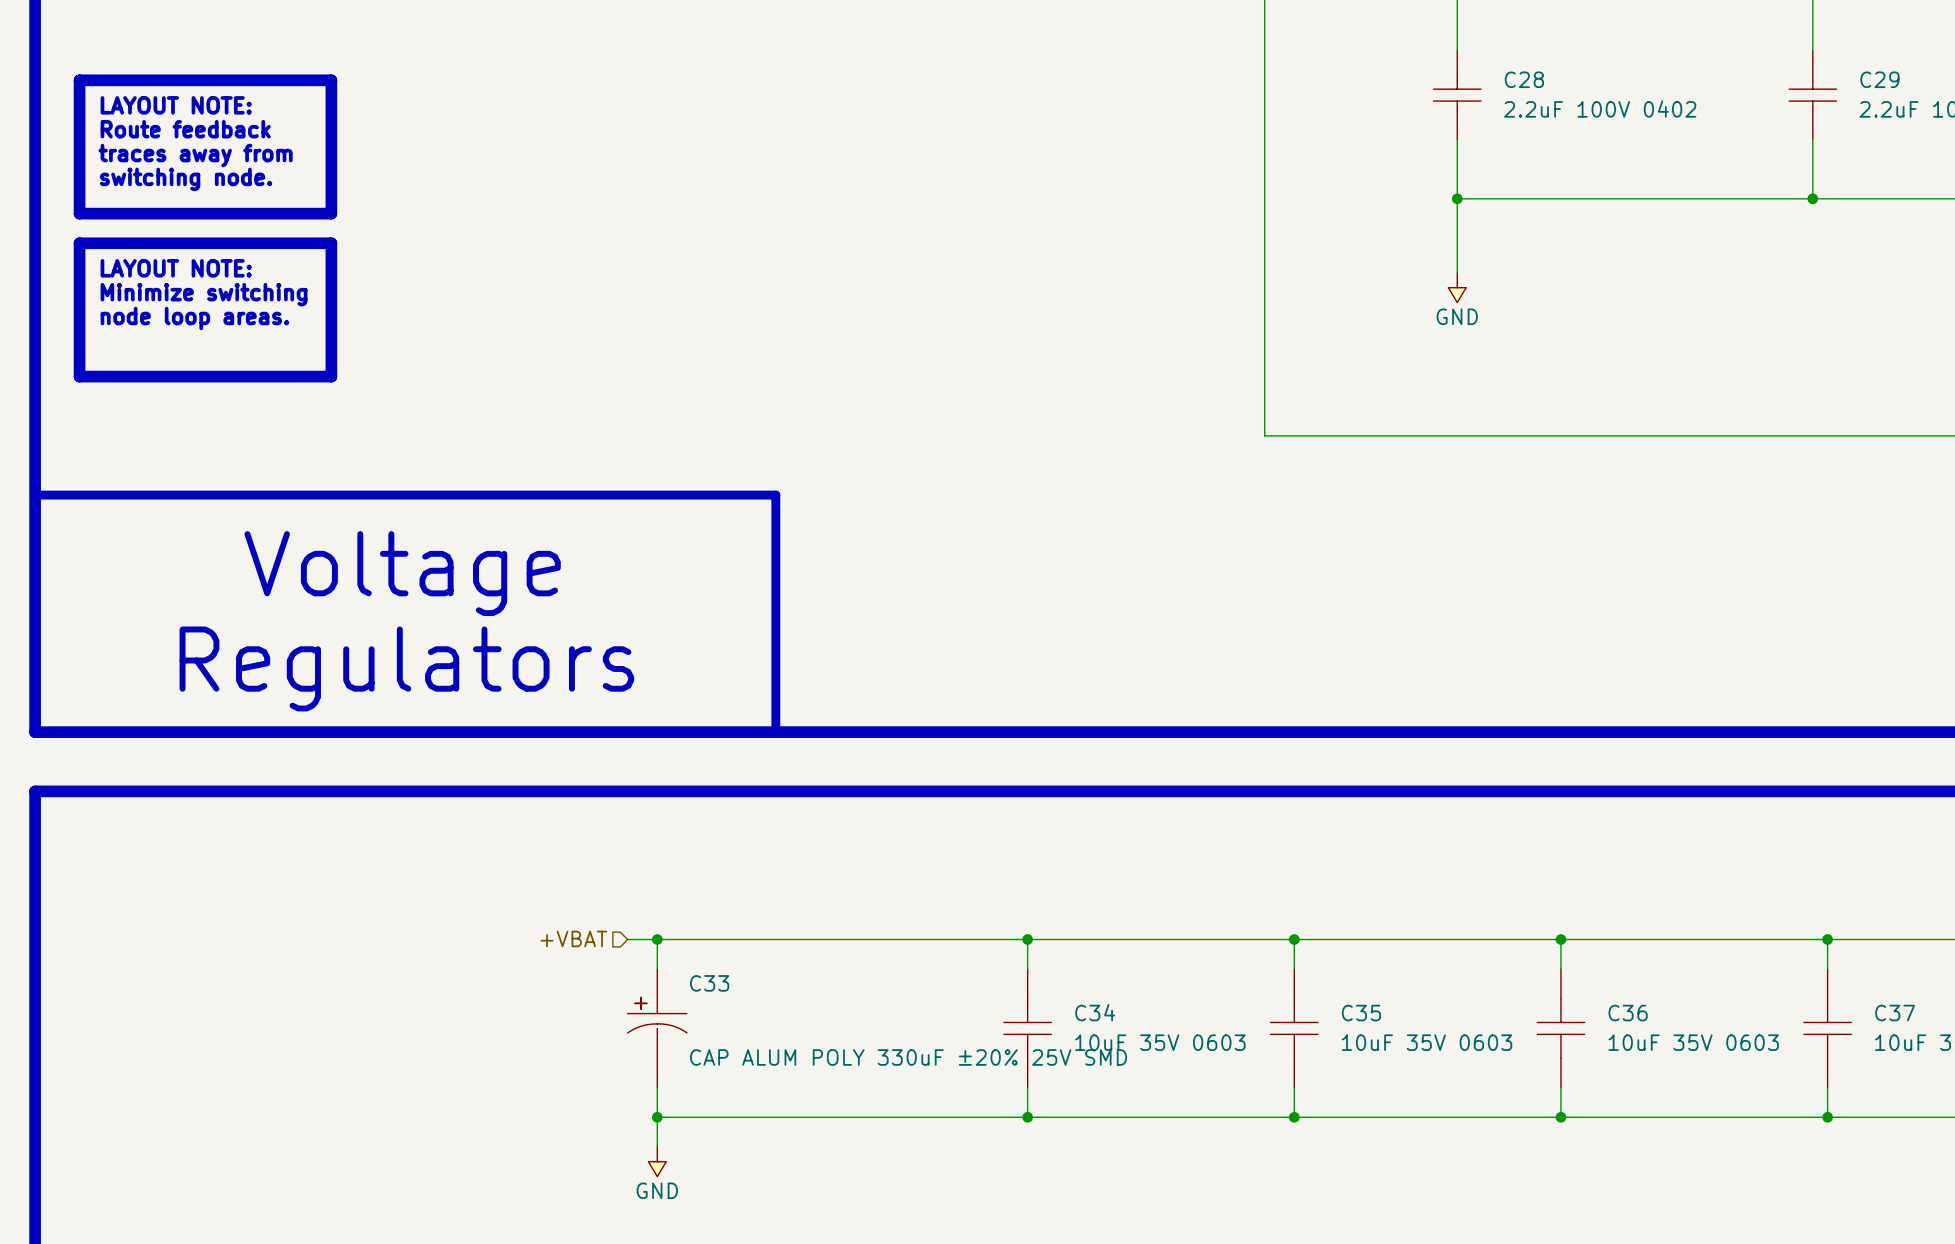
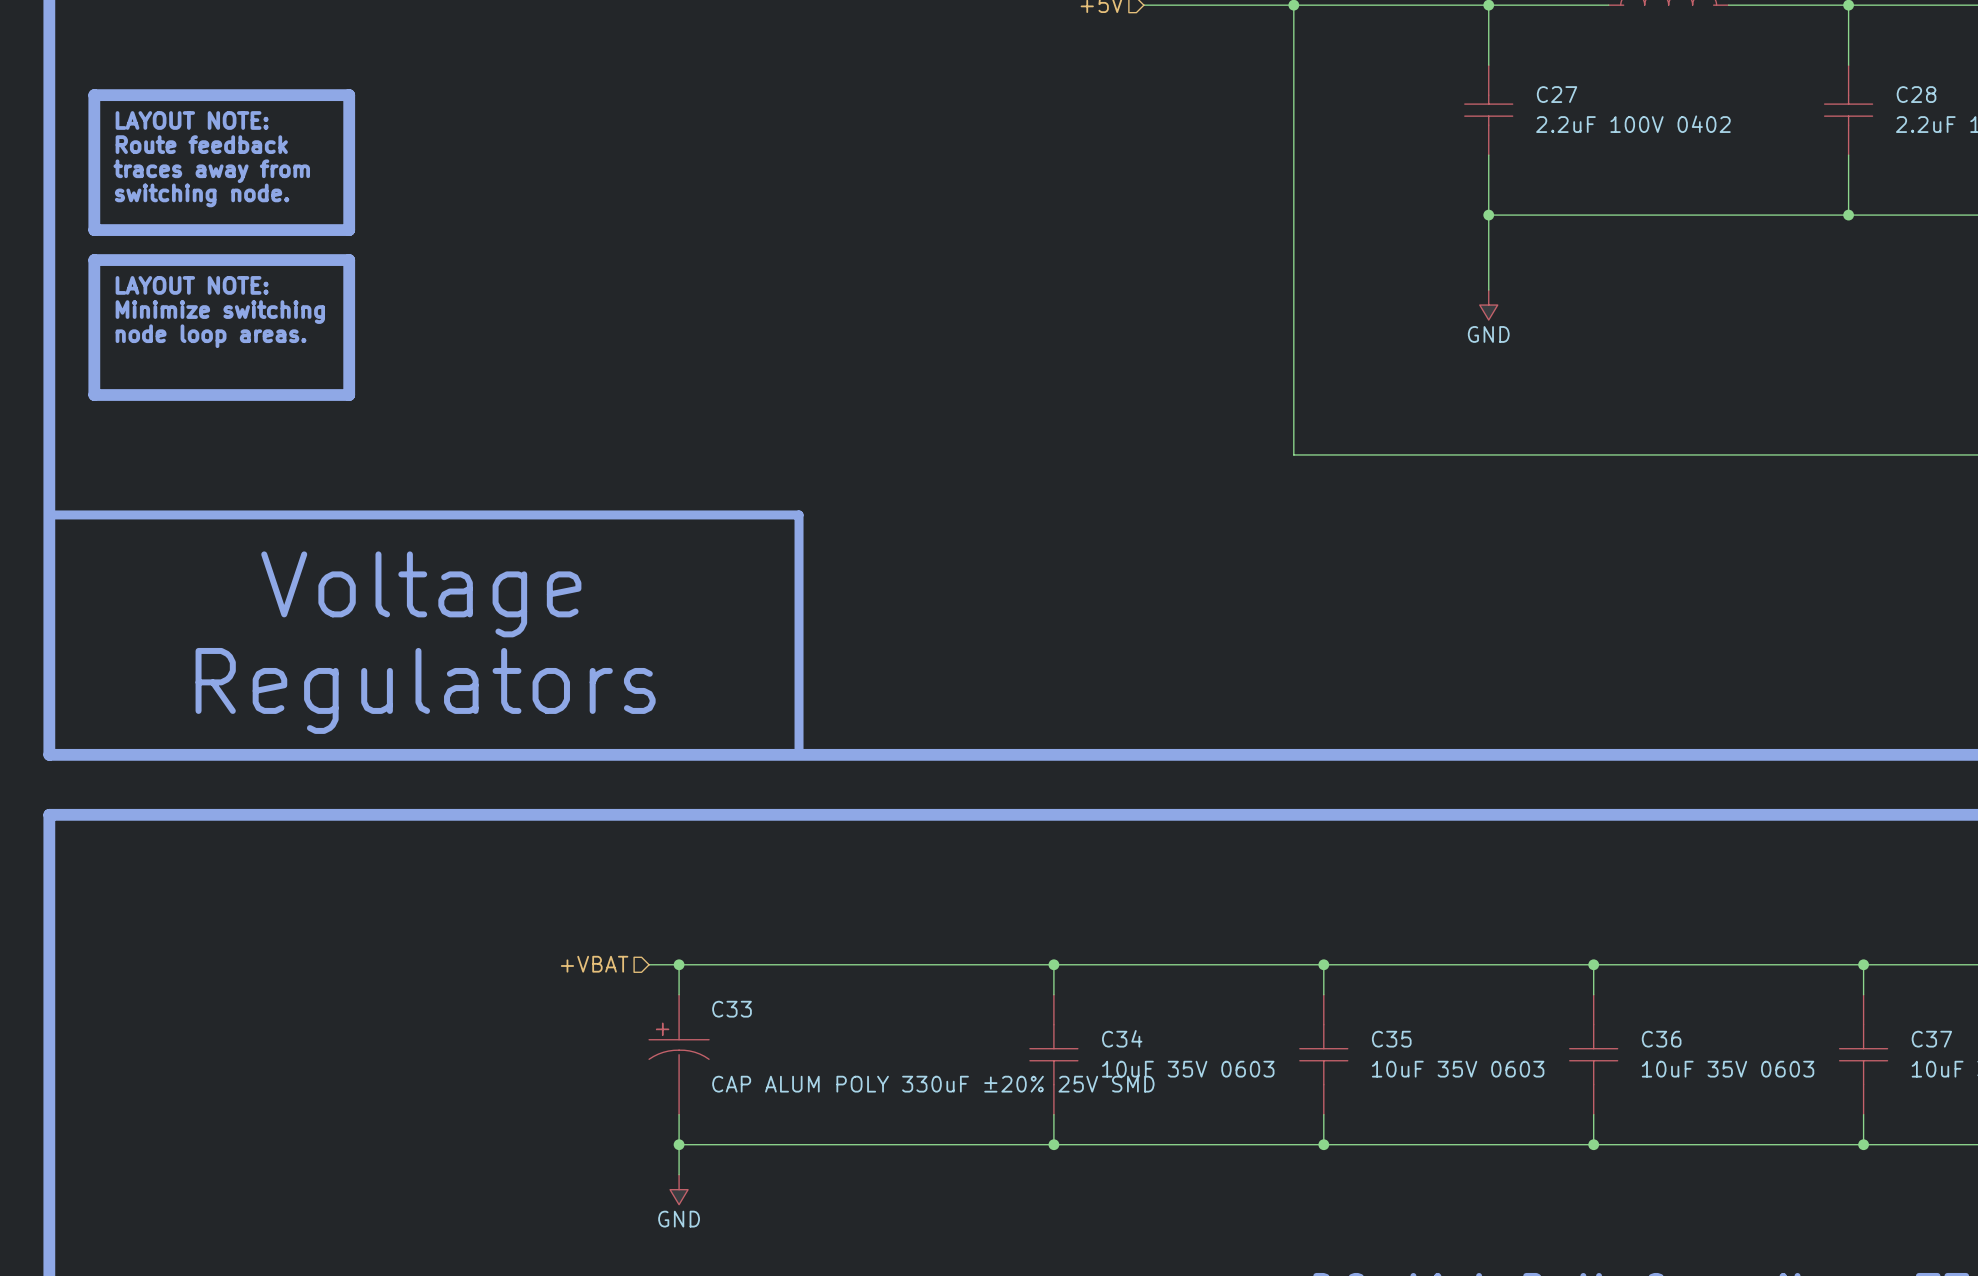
C28 name: C28 (1524, 79) -> C27 (1557, 94)
C29 name: C29 (1879, 79) -> C28 (1916, 94)

